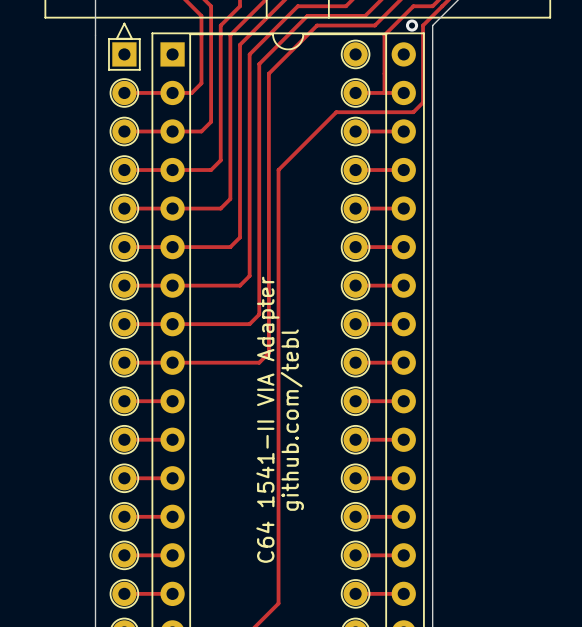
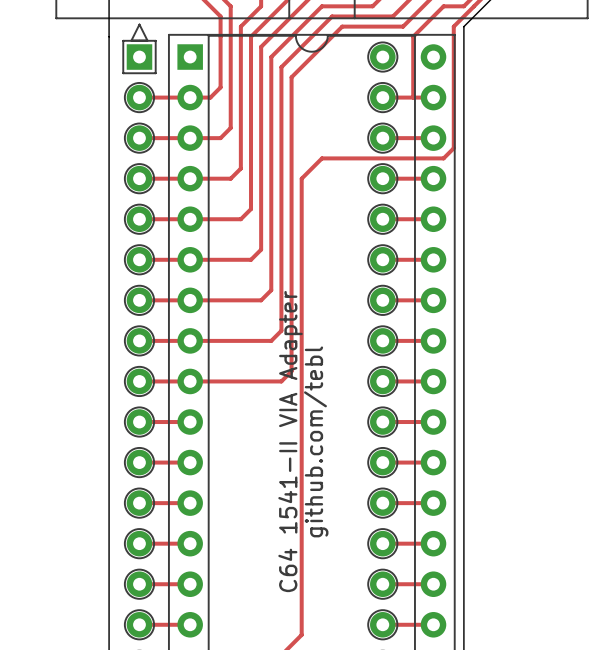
via: (412, 25) -> none
track: (423, 102) (413, 112) (336, 112) (297, 150) -> (453, 107) (453, 148) (443, 158) (321, 158)

